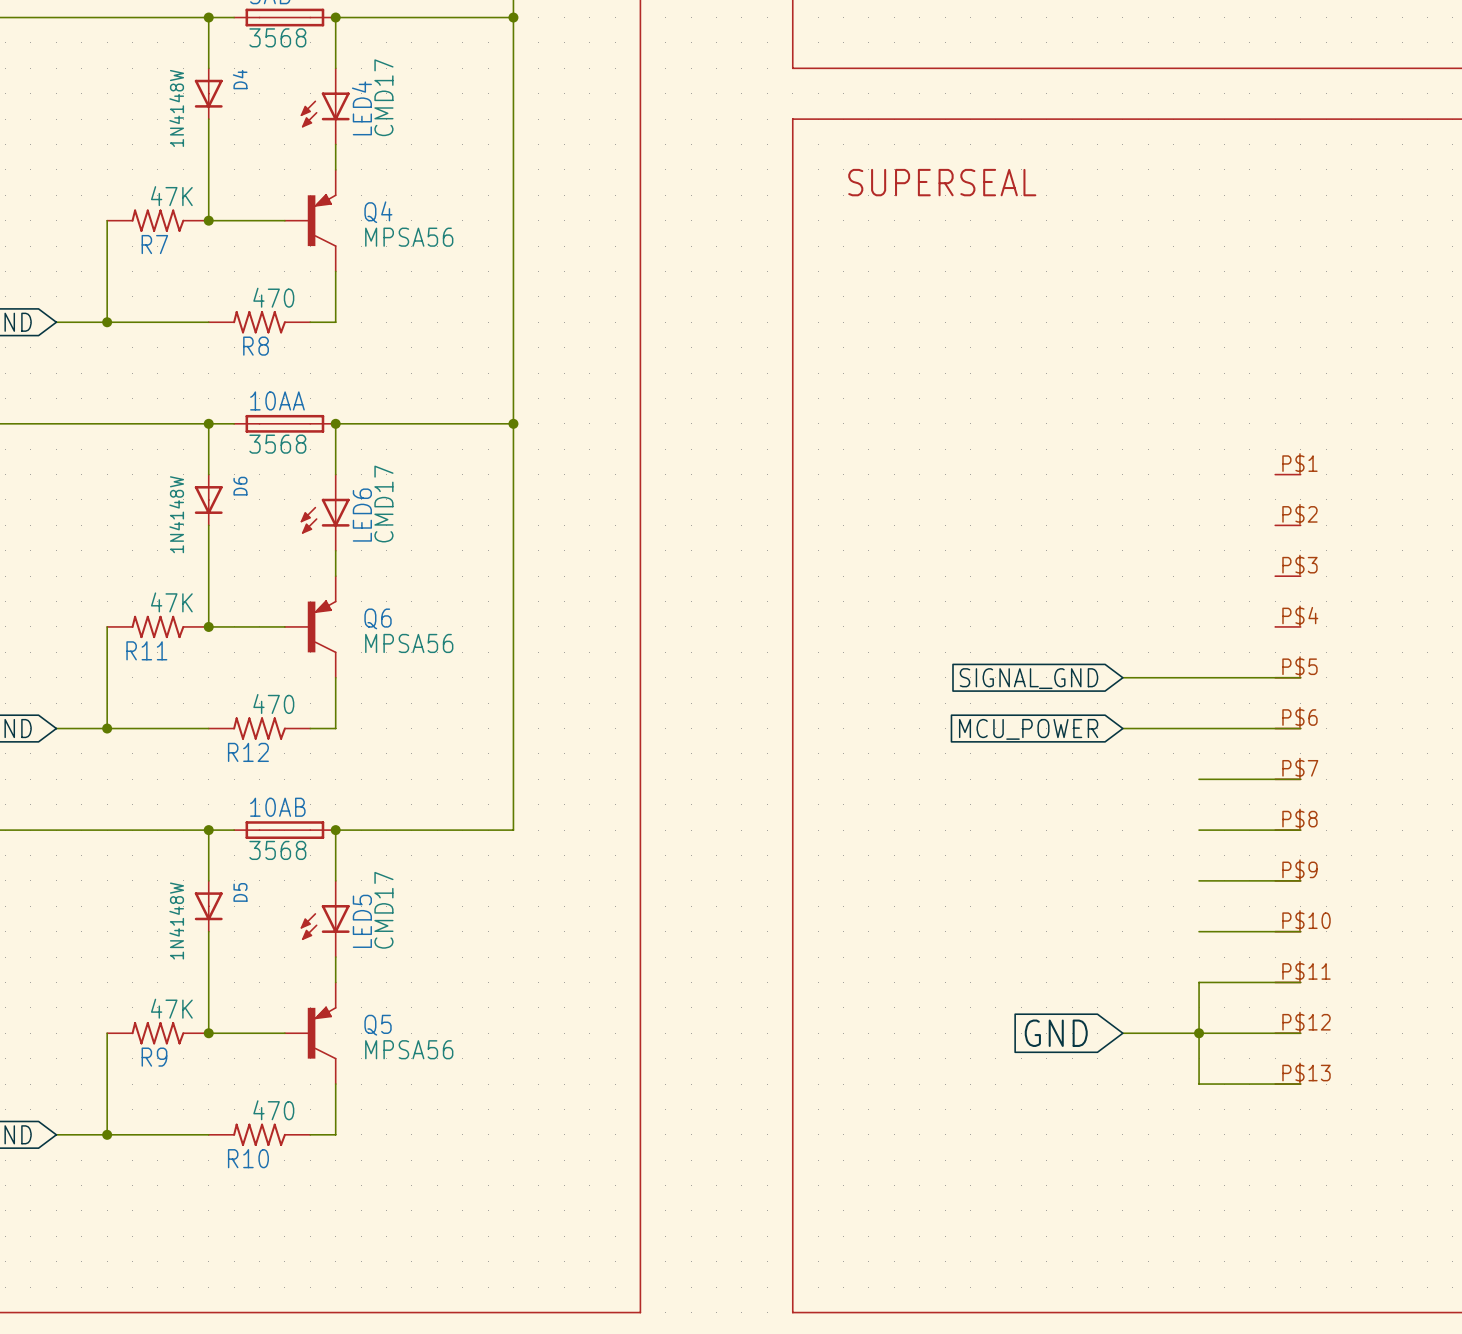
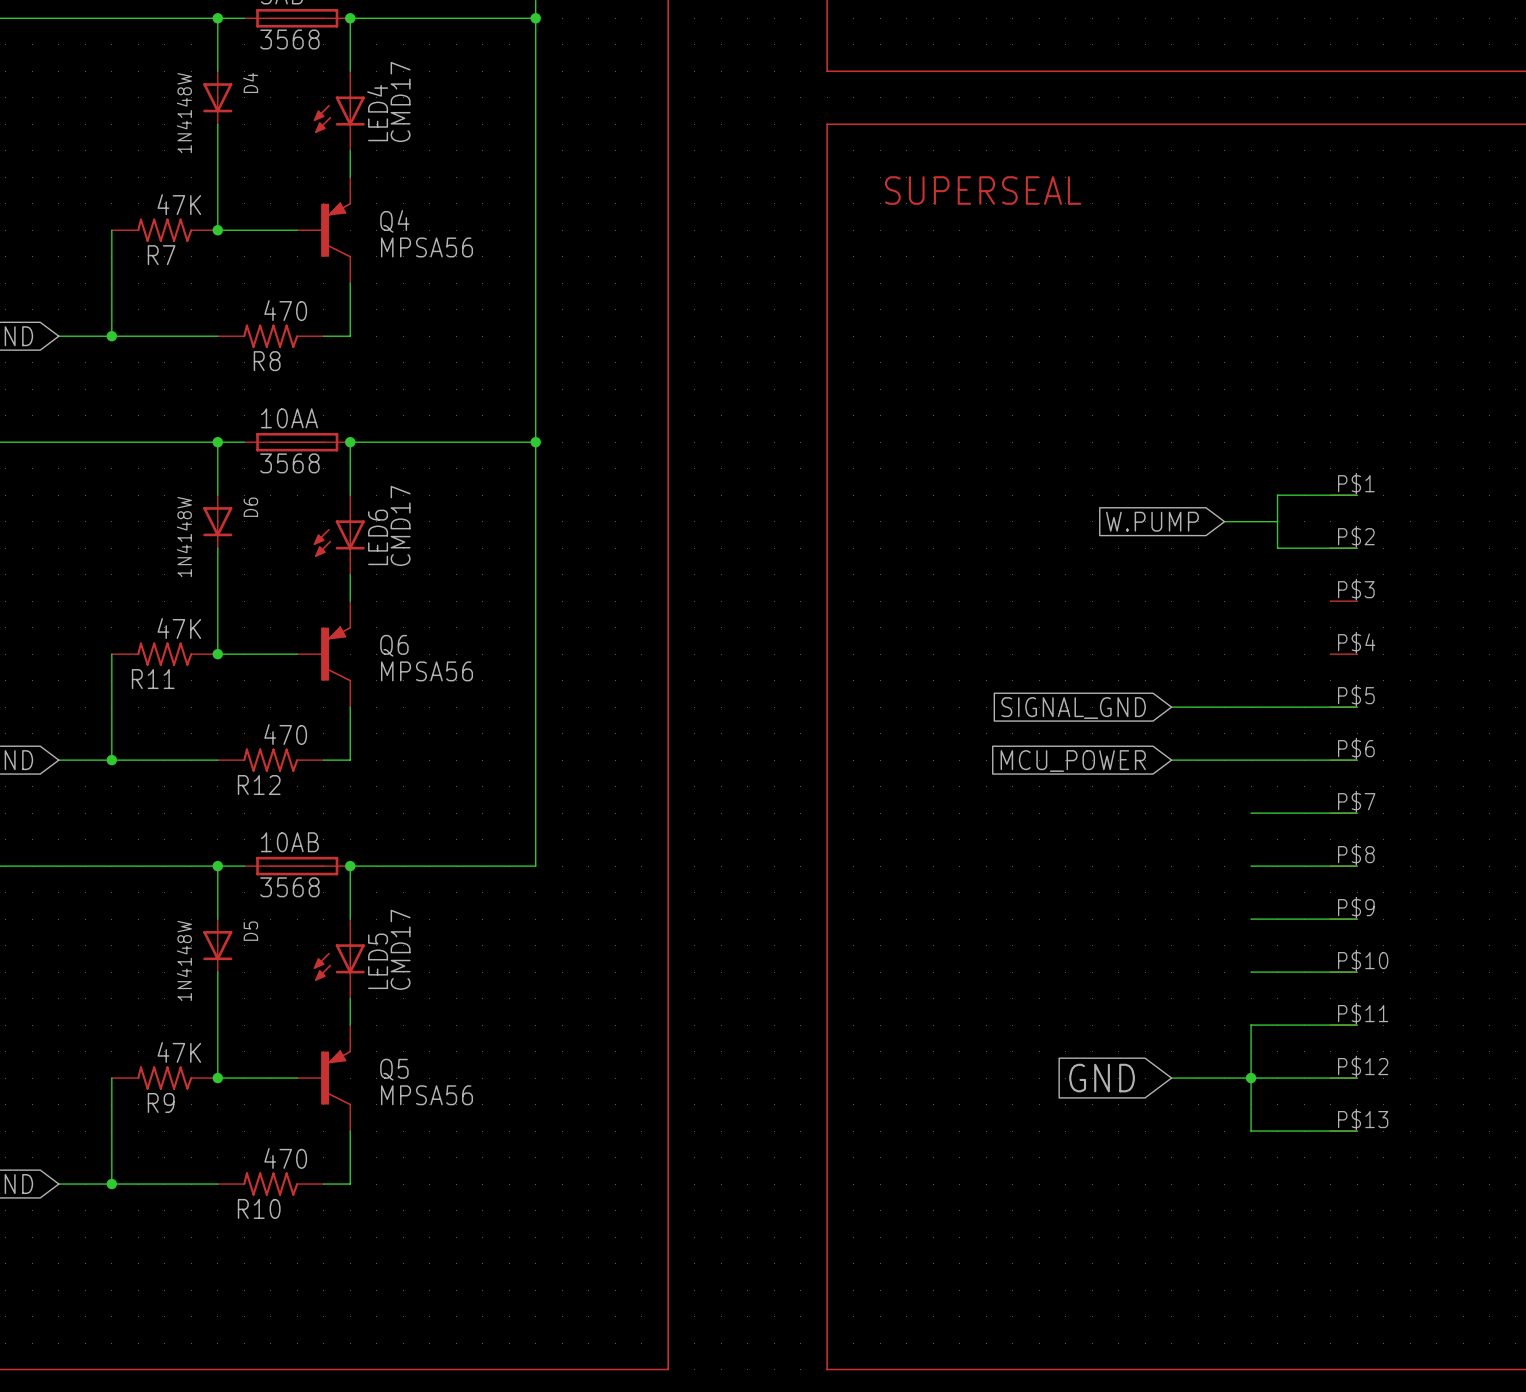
wire: none -> (1357, 495) (1277, 495) (1277, 548) (1357, 548)
global label: none -> W.PUMP (1152, 521)
wire: none -> (1224, 521) (1277, 521)

